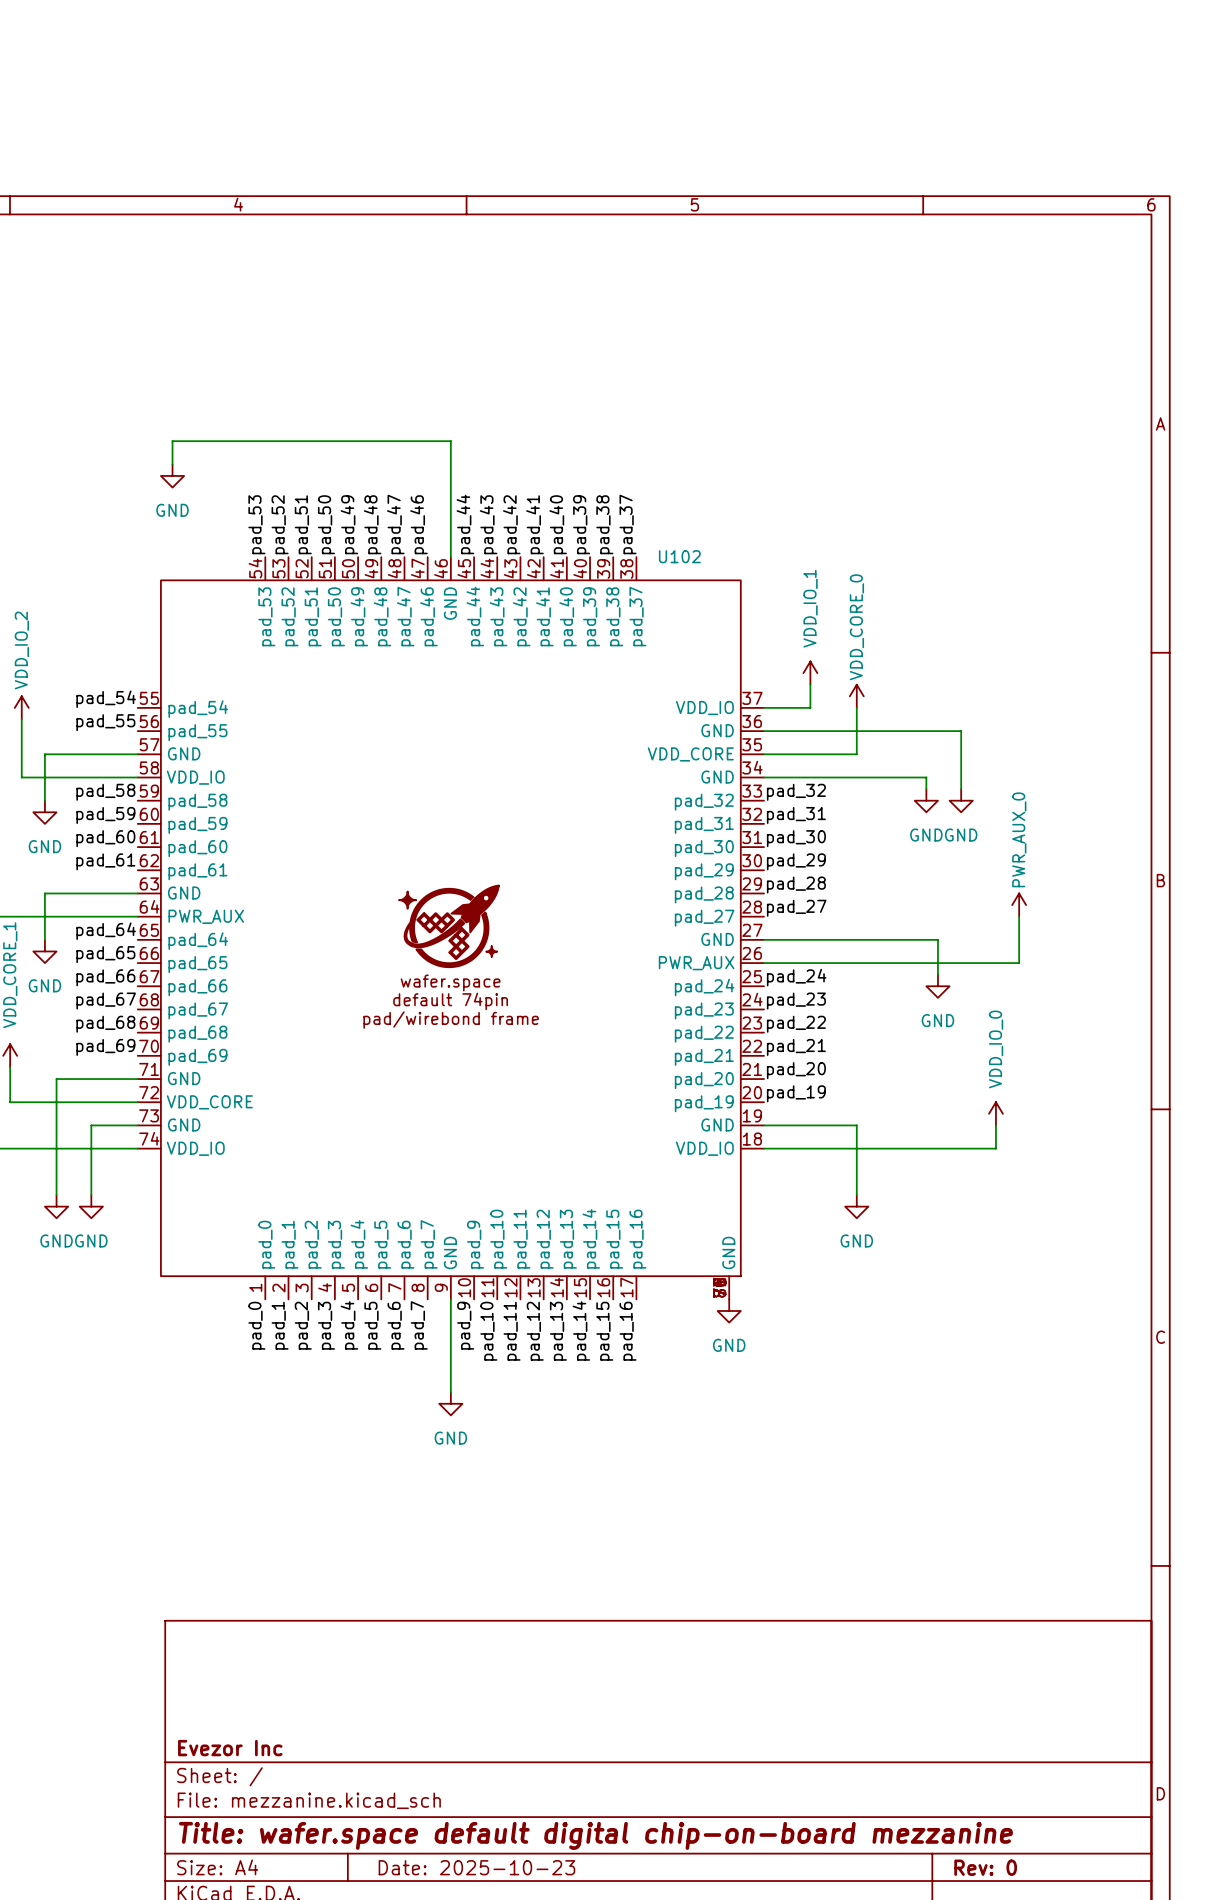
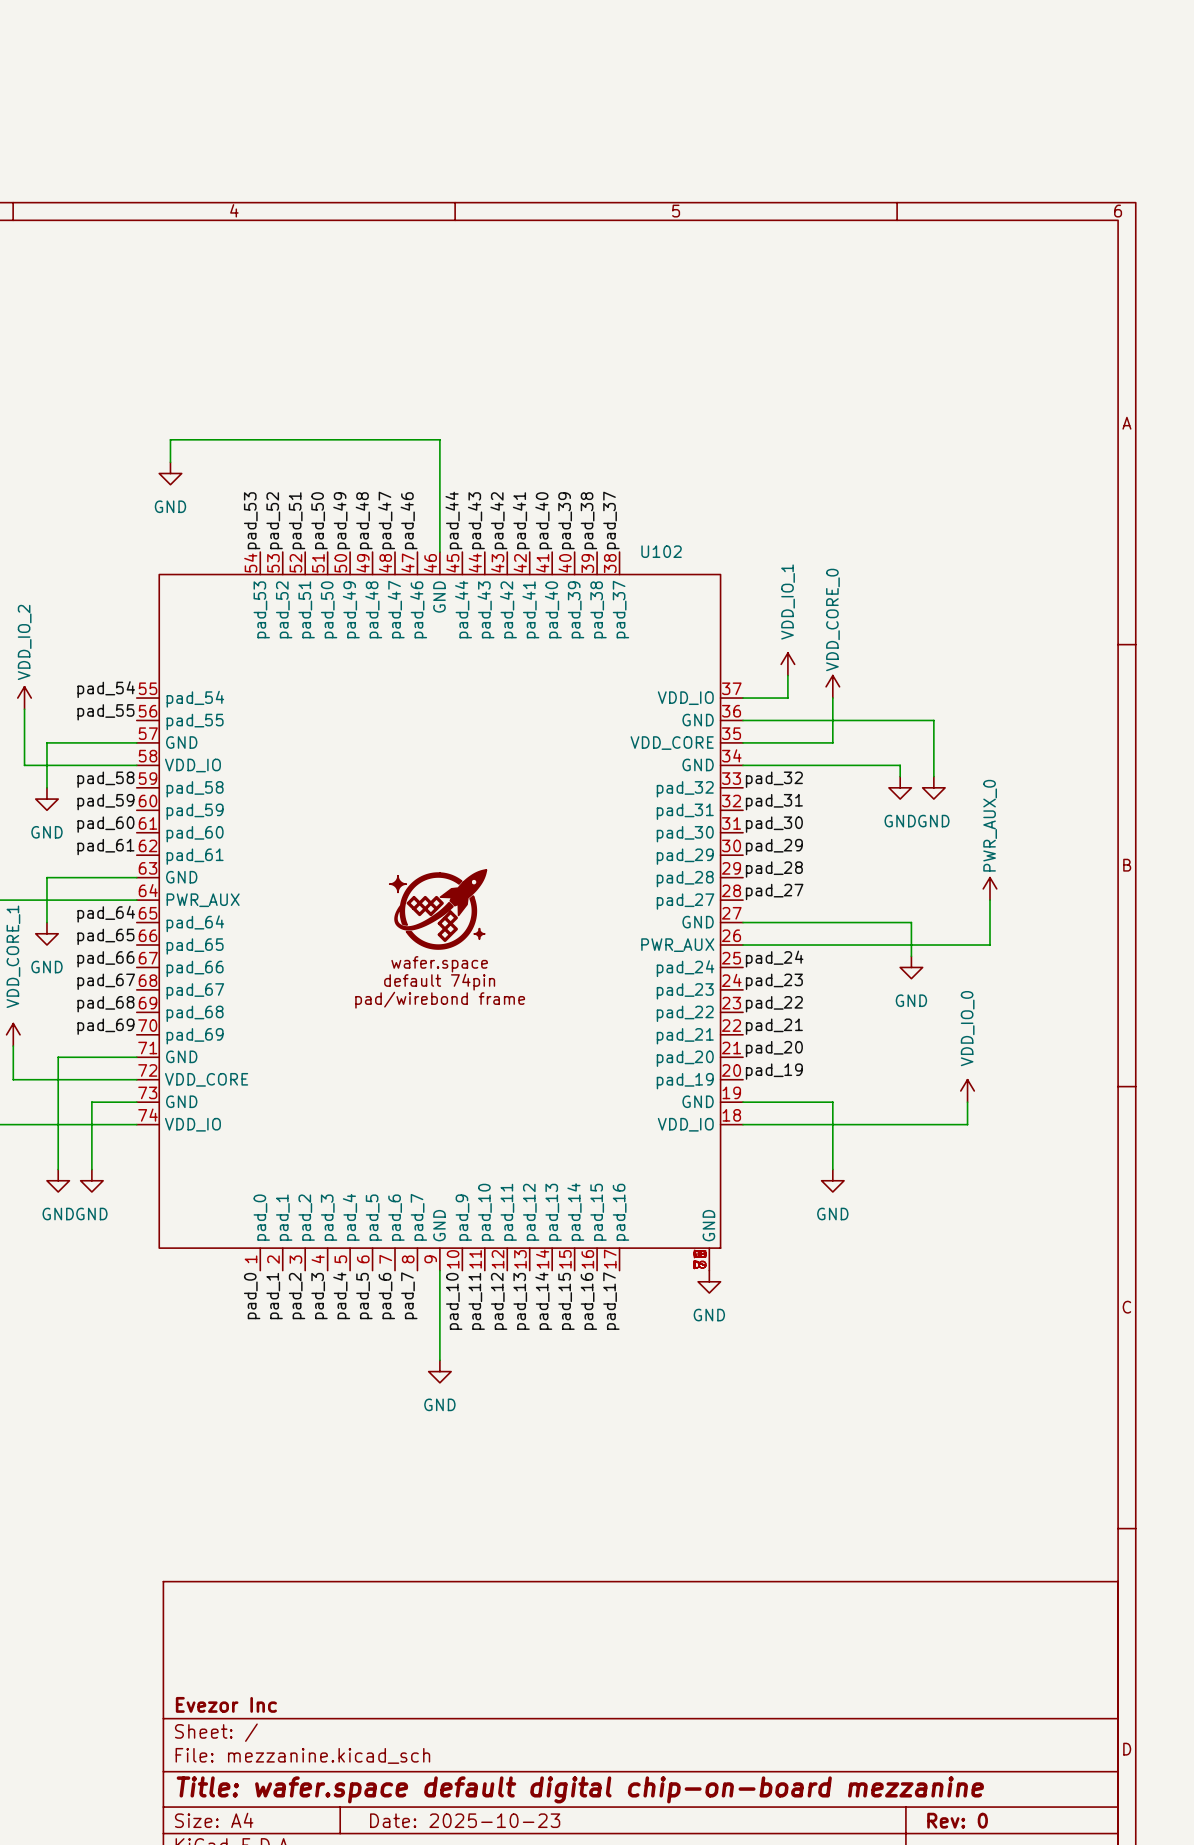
label: pad_9 (465, 1325) -> pad_10 (454, 1301)
label: pad_14 (581, 1330) -> pad_15 (566, 1301)
label: pad_10 (488, 1331) -> pad_11 (476, 1301)
label: pad_11 (512, 1331) -> pad_12 (499, 1301)
label: pad_12 (535, 1331) -> pad_13 (521, 1301)
label: pad_13 (558, 1331) -> pad_14 (543, 1301)
label: pad_15 (604, 1331) -> pad_16 (588, 1301)
label: pad_16 (628, 1331) -> pad_17 (611, 1301)

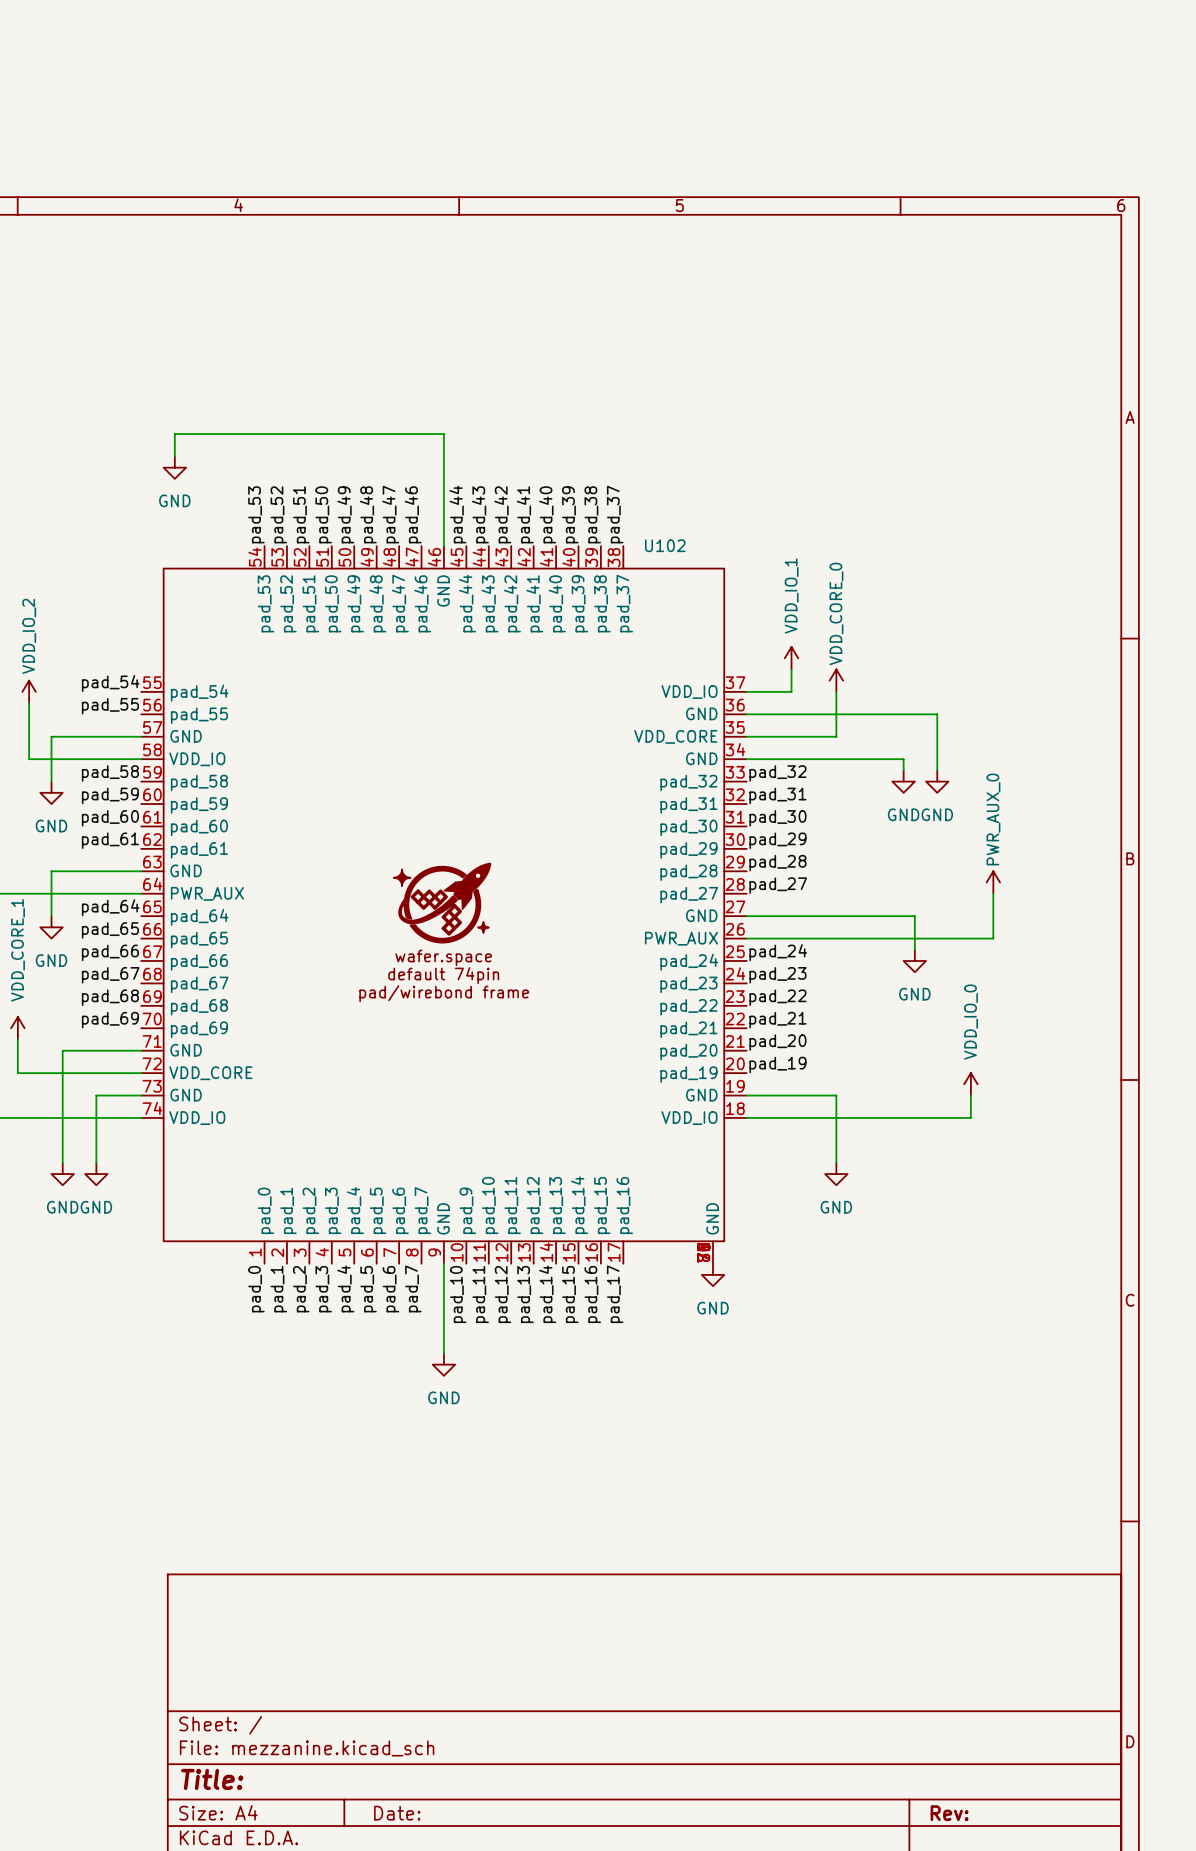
title block: Evezor Inc (226, 1704) -> none
title block: Title: wafer.space default digital chip-on-board mezzanine (580, 1789) -> Title: (212, 1779)
title block: Date: 2025-10-23 (465, 1820) -> Date: (397, 1813)
title block: Rev: 0 (957, 1820) -> Rev: (949, 1813)

